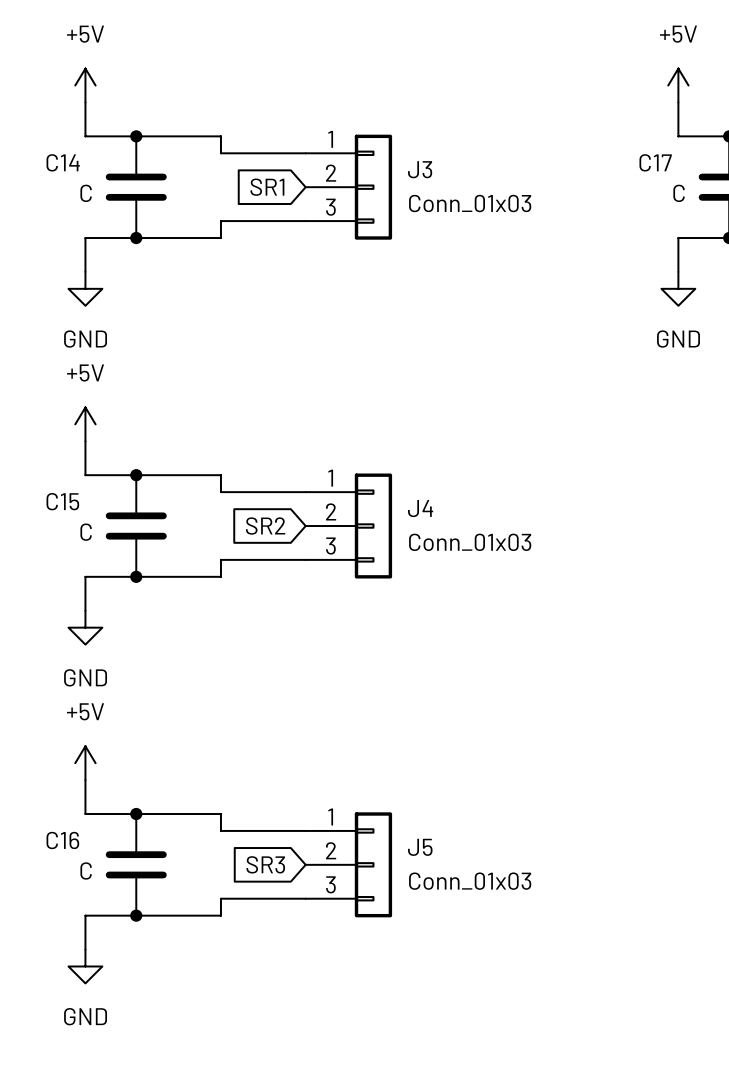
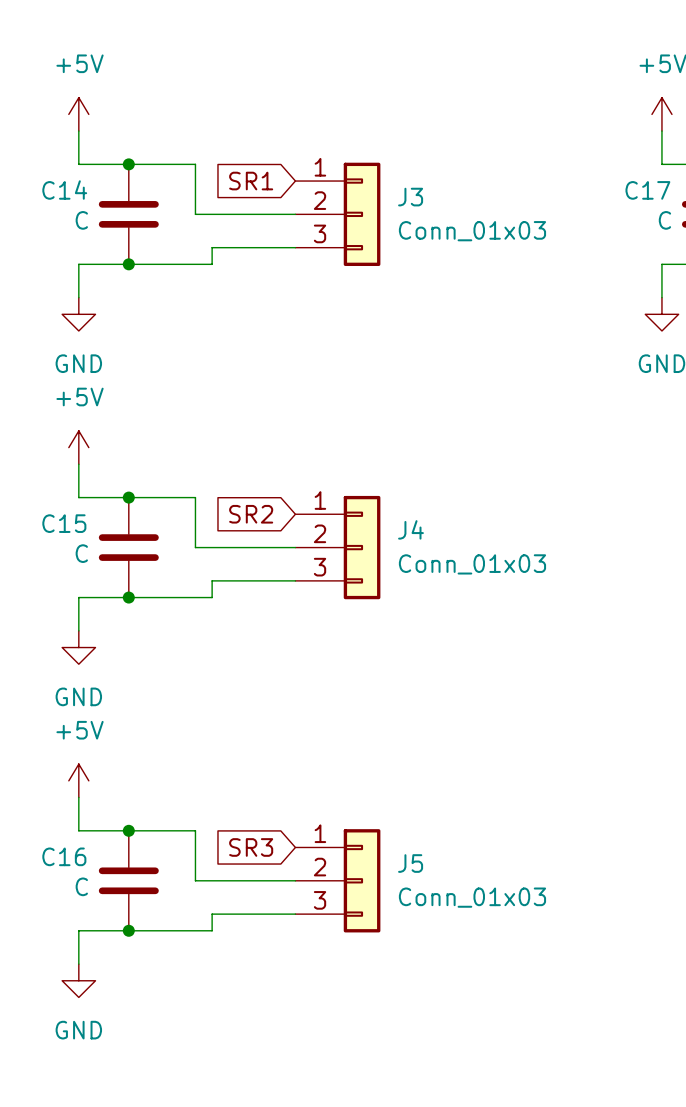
wire: (204, 136) (220, 136) (220, 153) (305, 153) -> (195, 164) (195, 214) (295, 214)
global label position: SR1 (267, 187) -> SR1 (251, 181)
wire: (204, 475) (220, 475) (220, 492) (305, 492) -> (195, 497) (195, 547) (295, 547)
global label position: SR2 (265, 526) -> SR2 (251, 514)
wire: (204, 814) (220, 814) (220, 830) (305, 830) -> (195, 830) (195, 880) (295, 880)
global label position: SR3 (265, 864) -> SR3 (251, 847)

